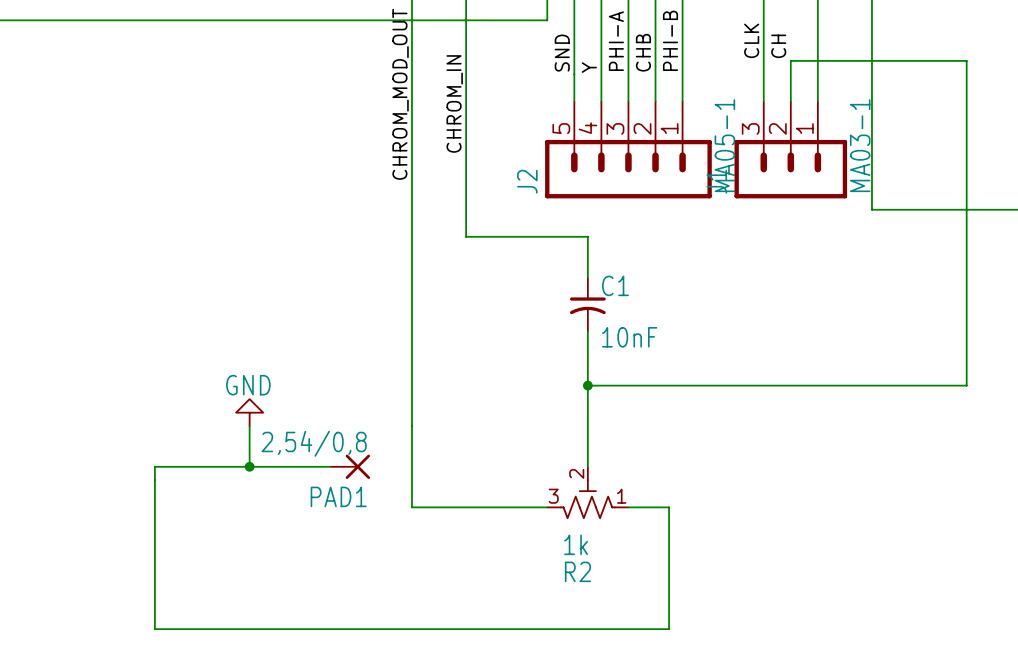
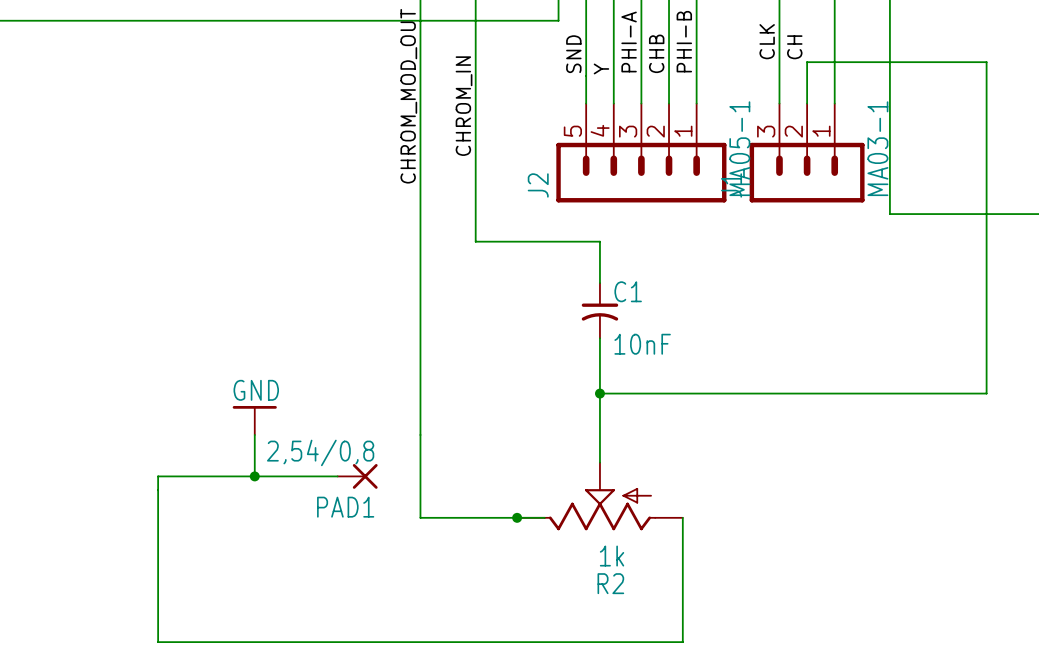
power symbol shape: [236, 399, 264, 427] -> [232, 405, 277, 435]
R2 symbol: [547, 466, 629, 519] -> [517, 462, 683, 531]
junction: none -> (517, 517)

